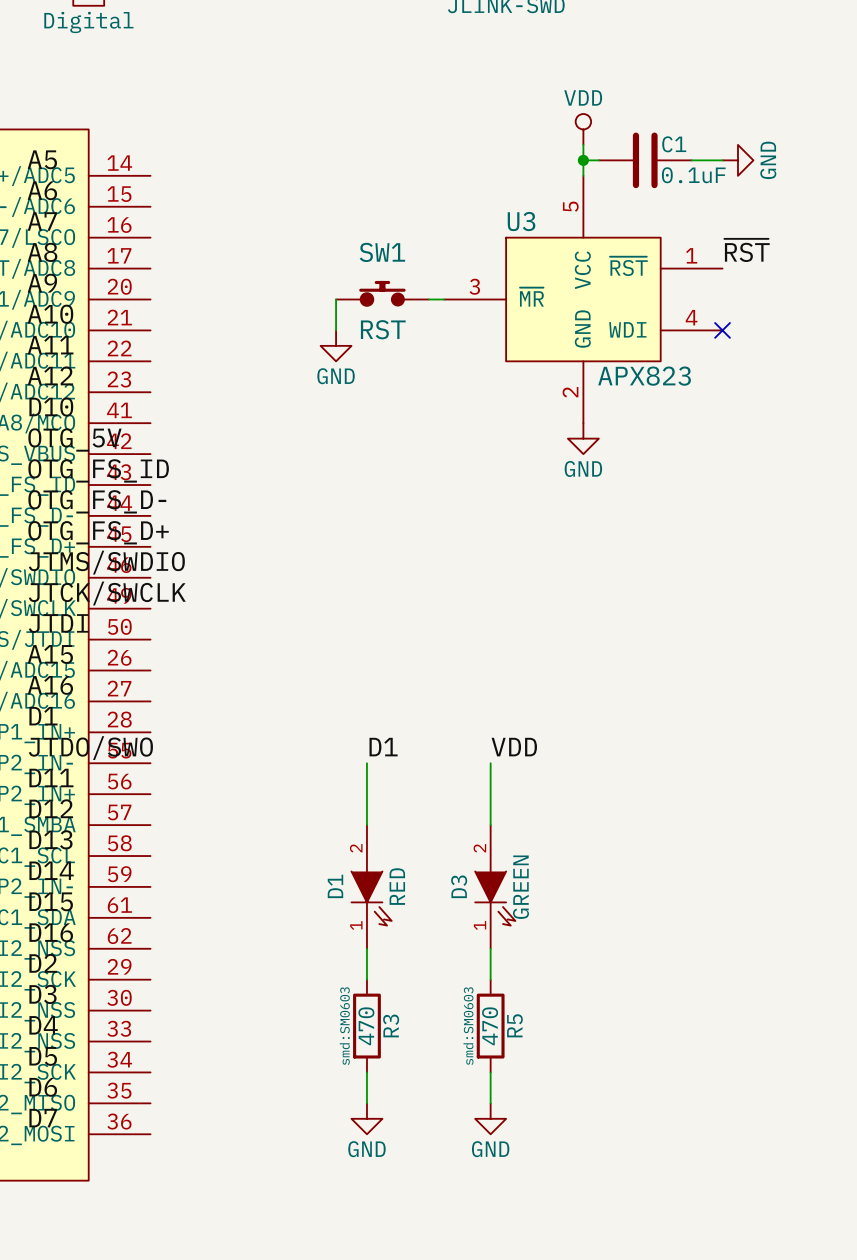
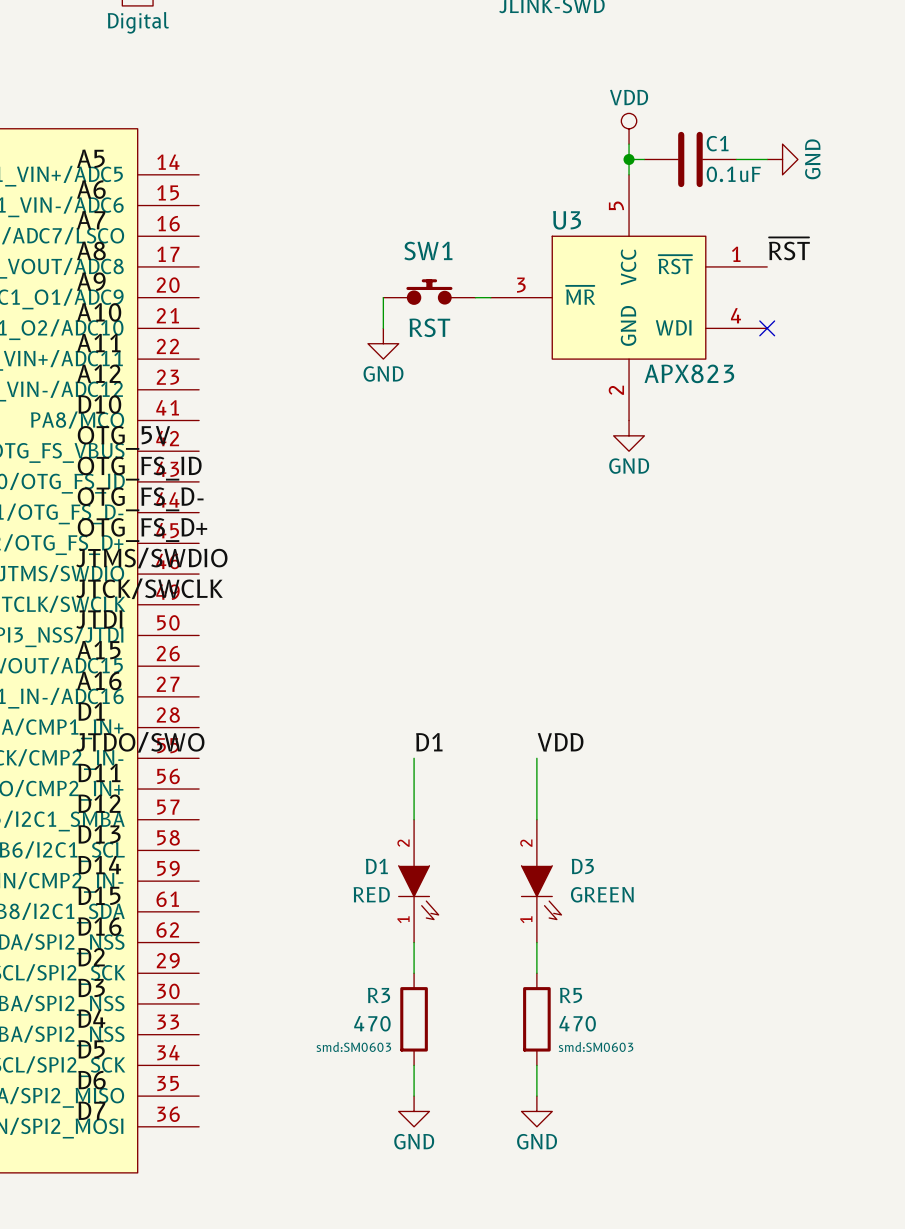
D1 name rotation: 0° (335, 886) -> 90° clockwise (376, 866)
D1 value rotation: 0° (397, 886) -> 90° clockwise (371, 894)
D1 value position: RED (397, 886) -> RED (371, 894)
D3 name rotation: 0° (459, 886) -> 90° clockwise (582, 866)
D3 name position: D3 (459, 886) -> D3 (582, 866)
D3 value rotation: 0° (520, 887) -> 90° clockwise (602, 894)
R3 name rotation: 0° (391, 1025) -> 90° clockwise (378, 995)
R3 name position: R3 (391, 1025) -> R3 (378, 995)
R5 name rotation: 0° (514, 1025) -> 90° clockwise (571, 995)
R3 text rotation: 0° (344, 1026) -> 90° clockwise (353, 1046)
R3 value rotation: 0° (366, 1026) -> 90° clockwise (372, 1023)
R5 text rotation: 0° (468, 1026) -> 90° clockwise (596, 1046)
R5 value rotation: 0° (490, 1026) -> 90° clockwise (577, 1023)

